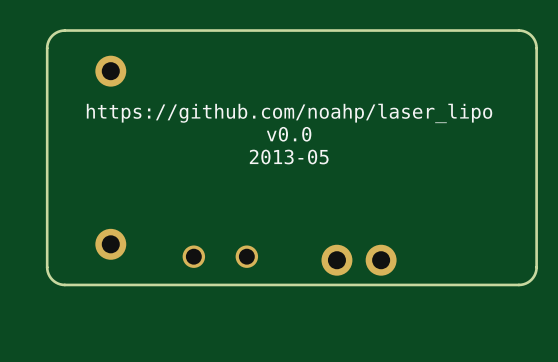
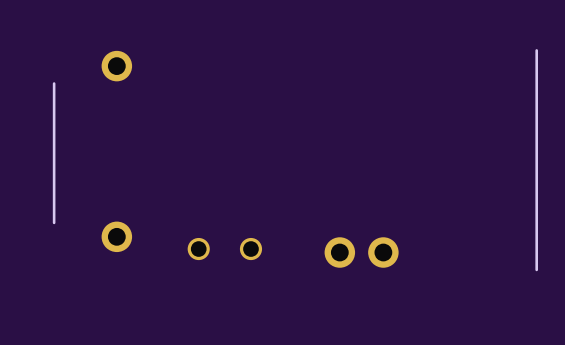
board edge: (536, 55) (536, 43) (532, 37) (527, 32) (518, 30) (62, 30) (52, 35) (47, 43) (47, 88) -> none
text: https://github.com/noahp/laser_lipo (289, 113) -> none
text: v0.0 (289, 134) -> none
text: 2013-05 (289, 157) -> none
board edge: (47, 230) (47, 271) (52, 279) (62, 284) (518, 284) (531, 279) (536, 267) -> (536, 269) (536, 259)

